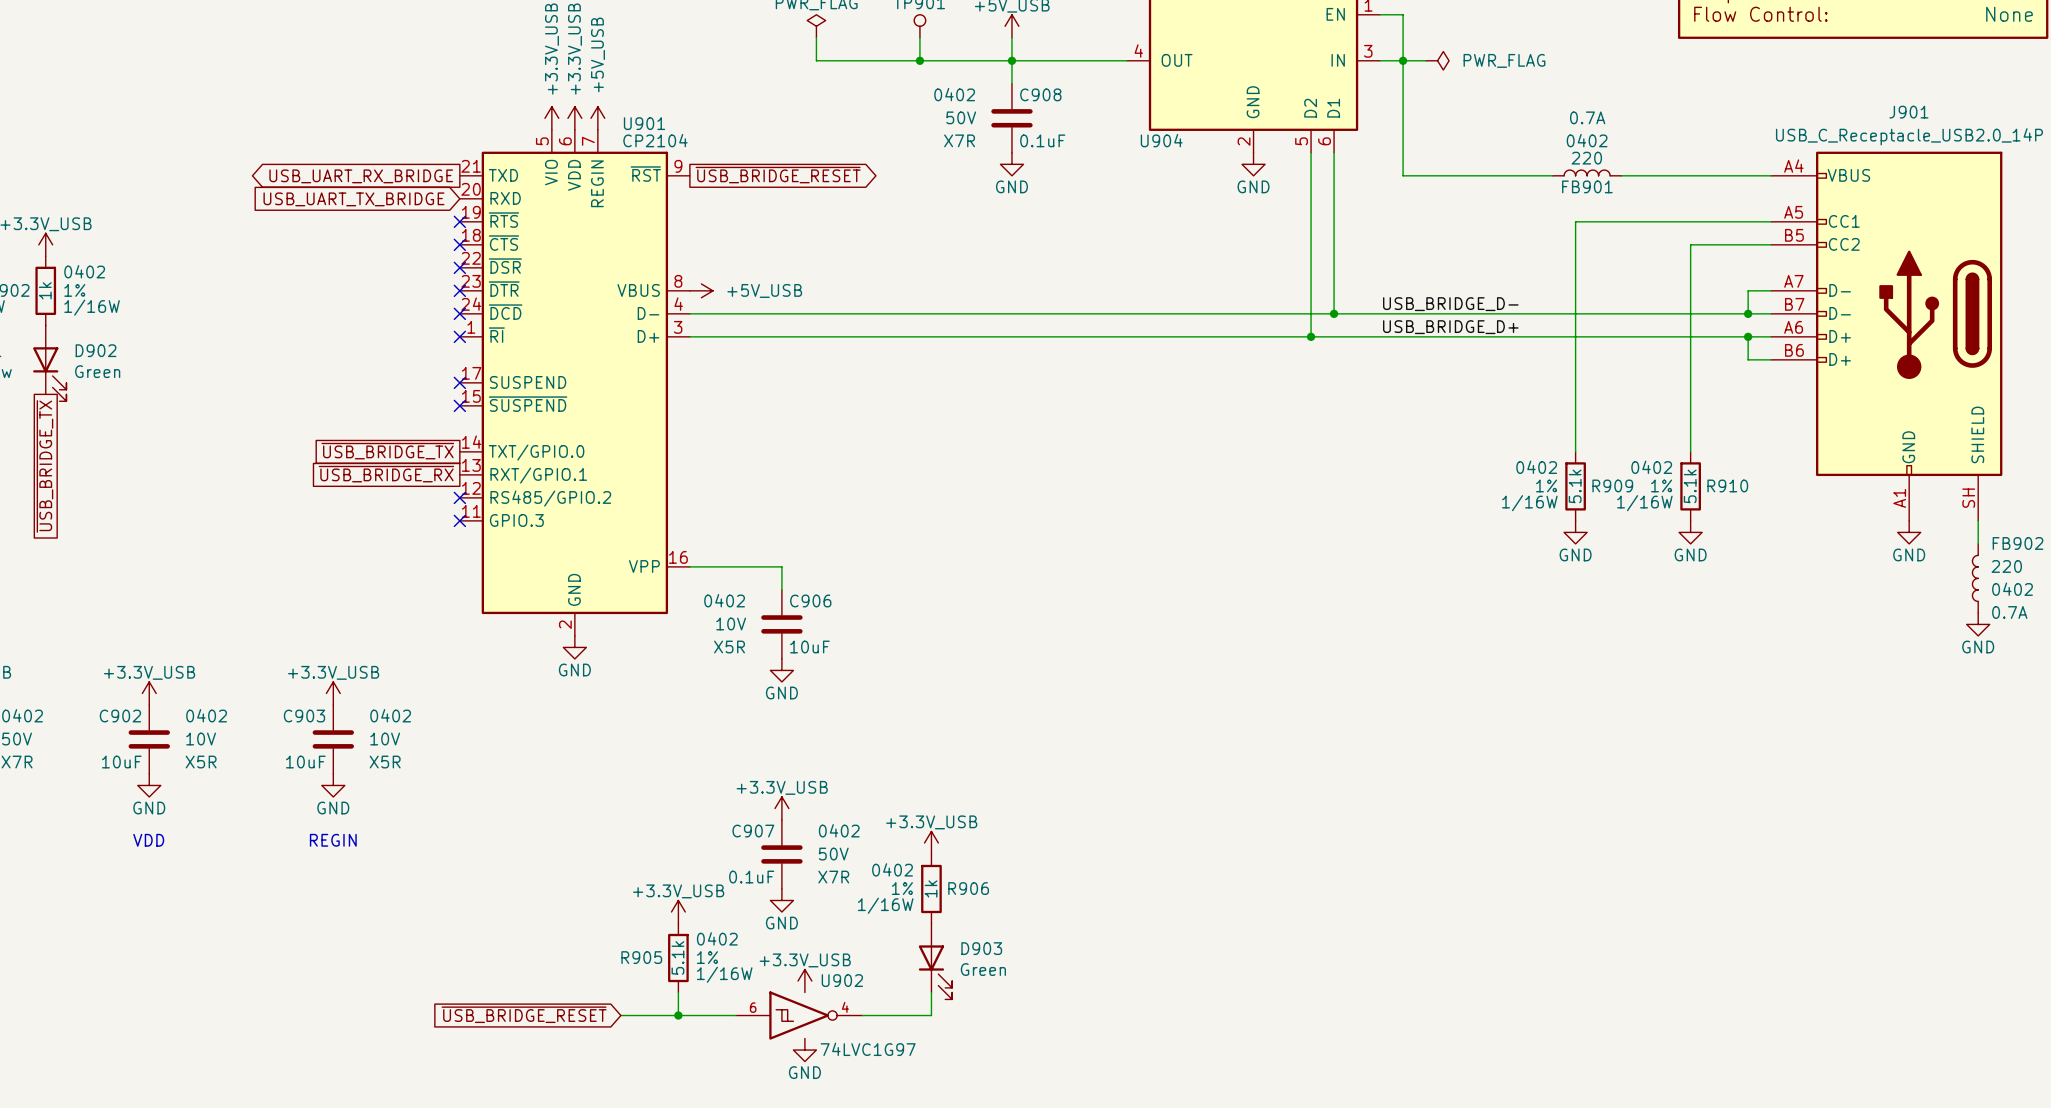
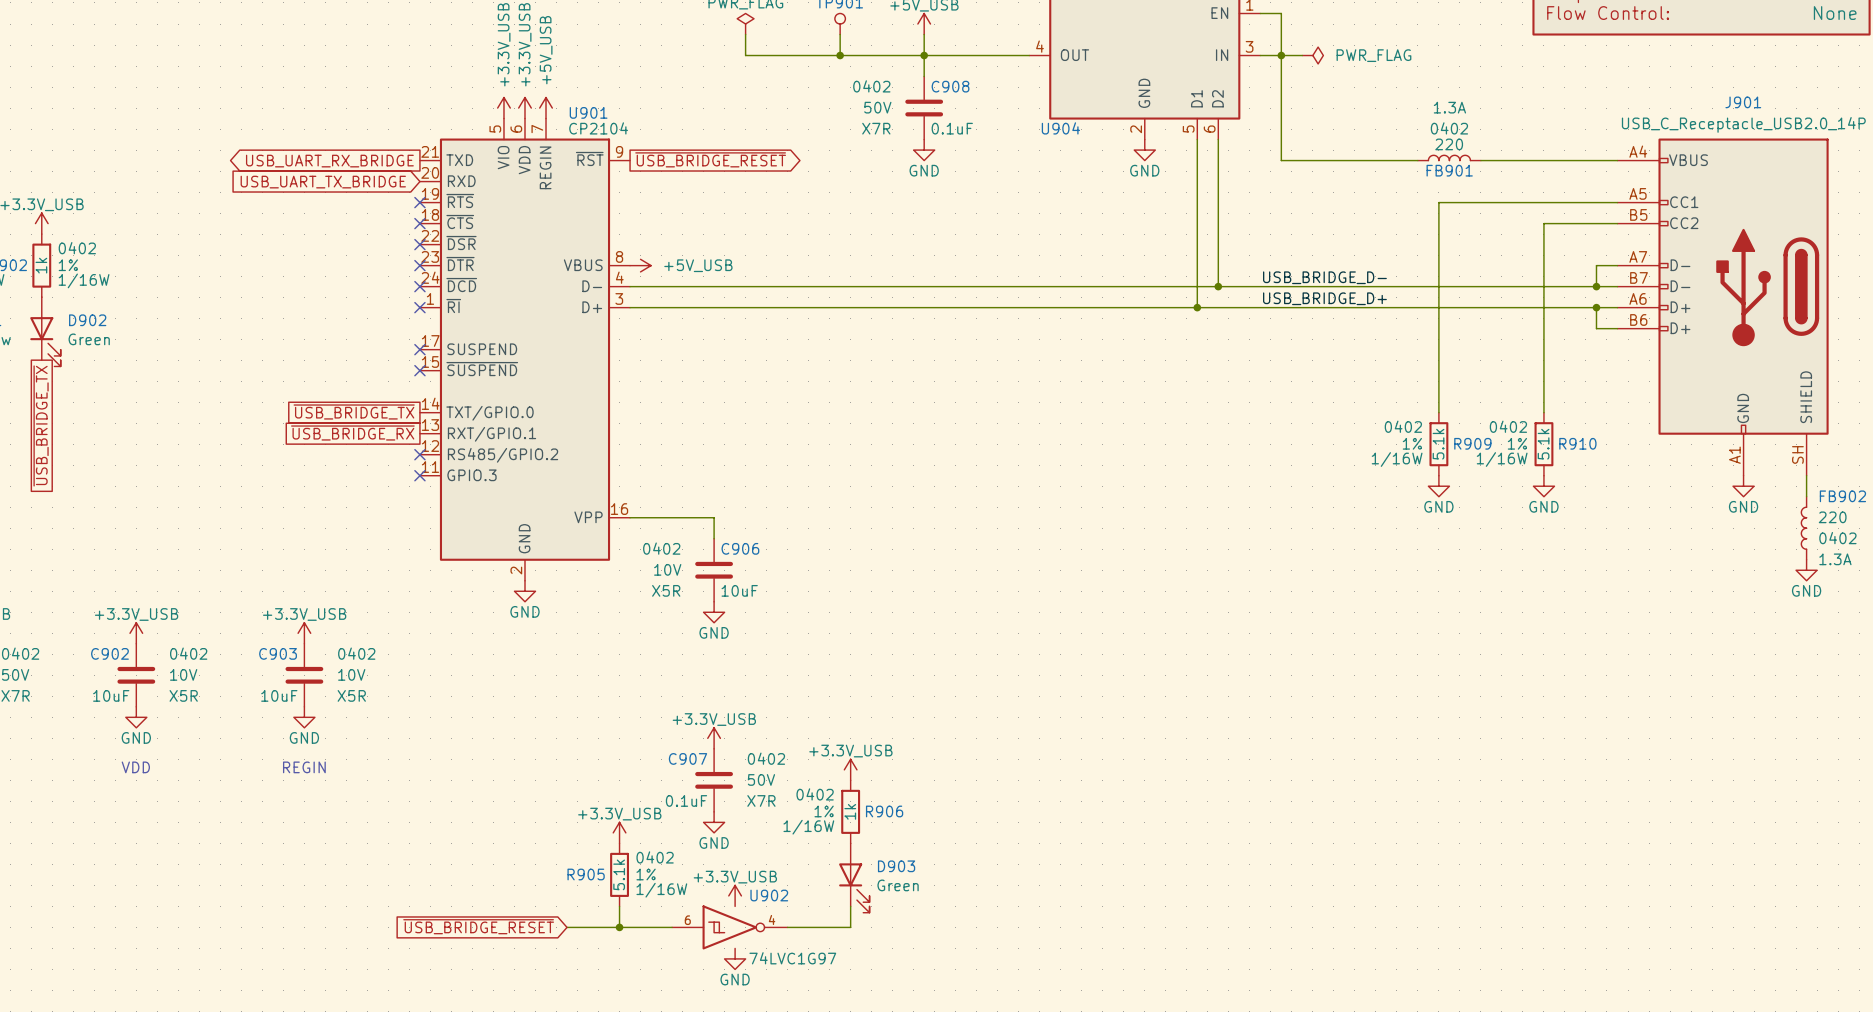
U904 pin name: D2 (1310, 108) -> D1 (1196, 98)
U904 pin name: D1 (1333, 108) -> D2 (1217, 98)
FB901 text: 0.7A (1587, 117) -> 1.3A (1449, 107)
FB902 text: 0.7A (2009, 612) -> 1.3A (1835, 559)

